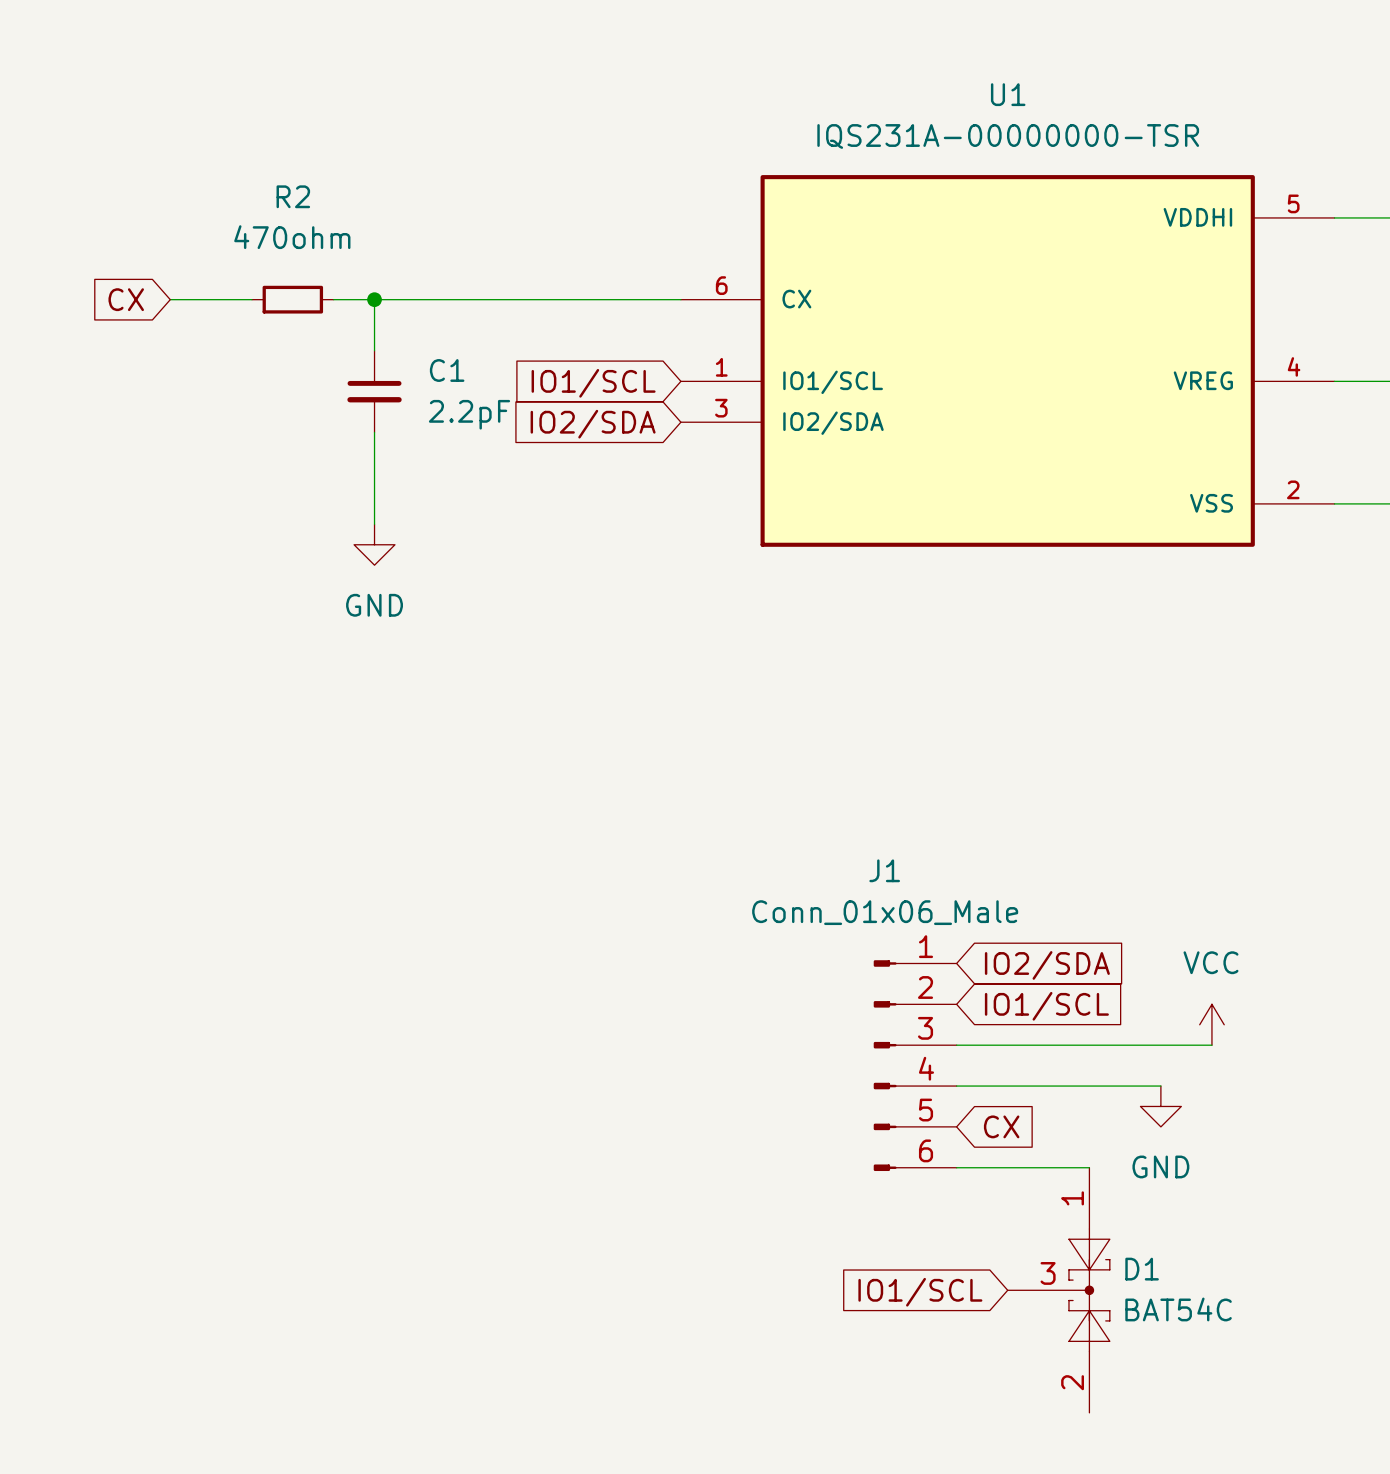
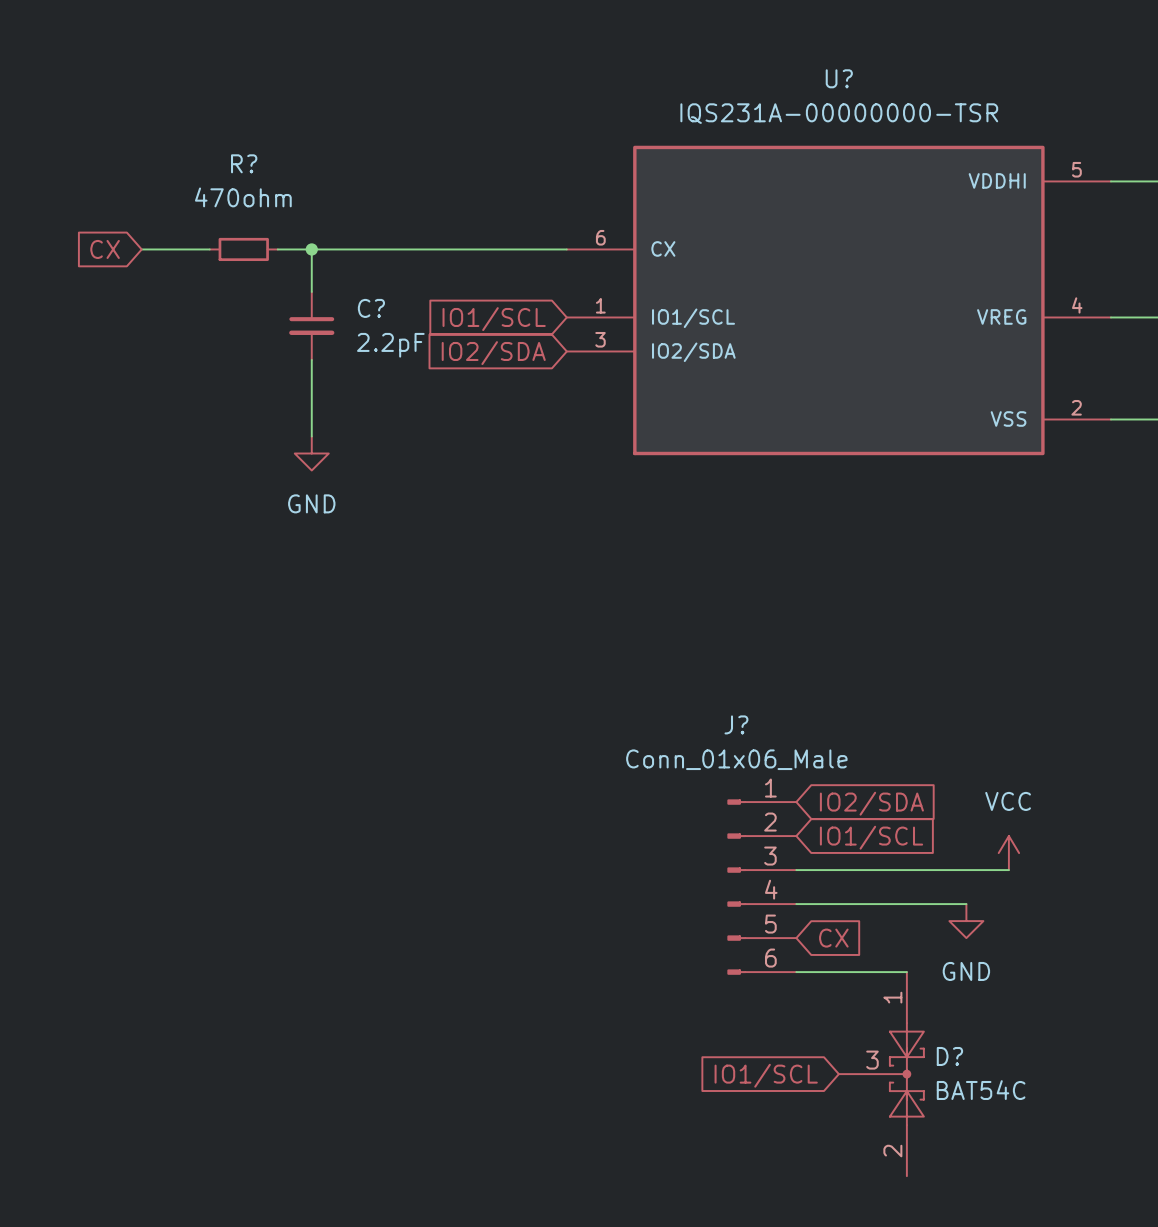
U1 name: U1 (1008, 94) -> U? (839, 78)
R2 name: R2 (293, 196) -> R? (244, 163)
C1 name: C1 (447, 370) -> C? (371, 308)
J1 name: J1 (884, 870) -> J? (736, 724)
D1 name: D1 (1142, 1269) -> D? (949, 1056)

